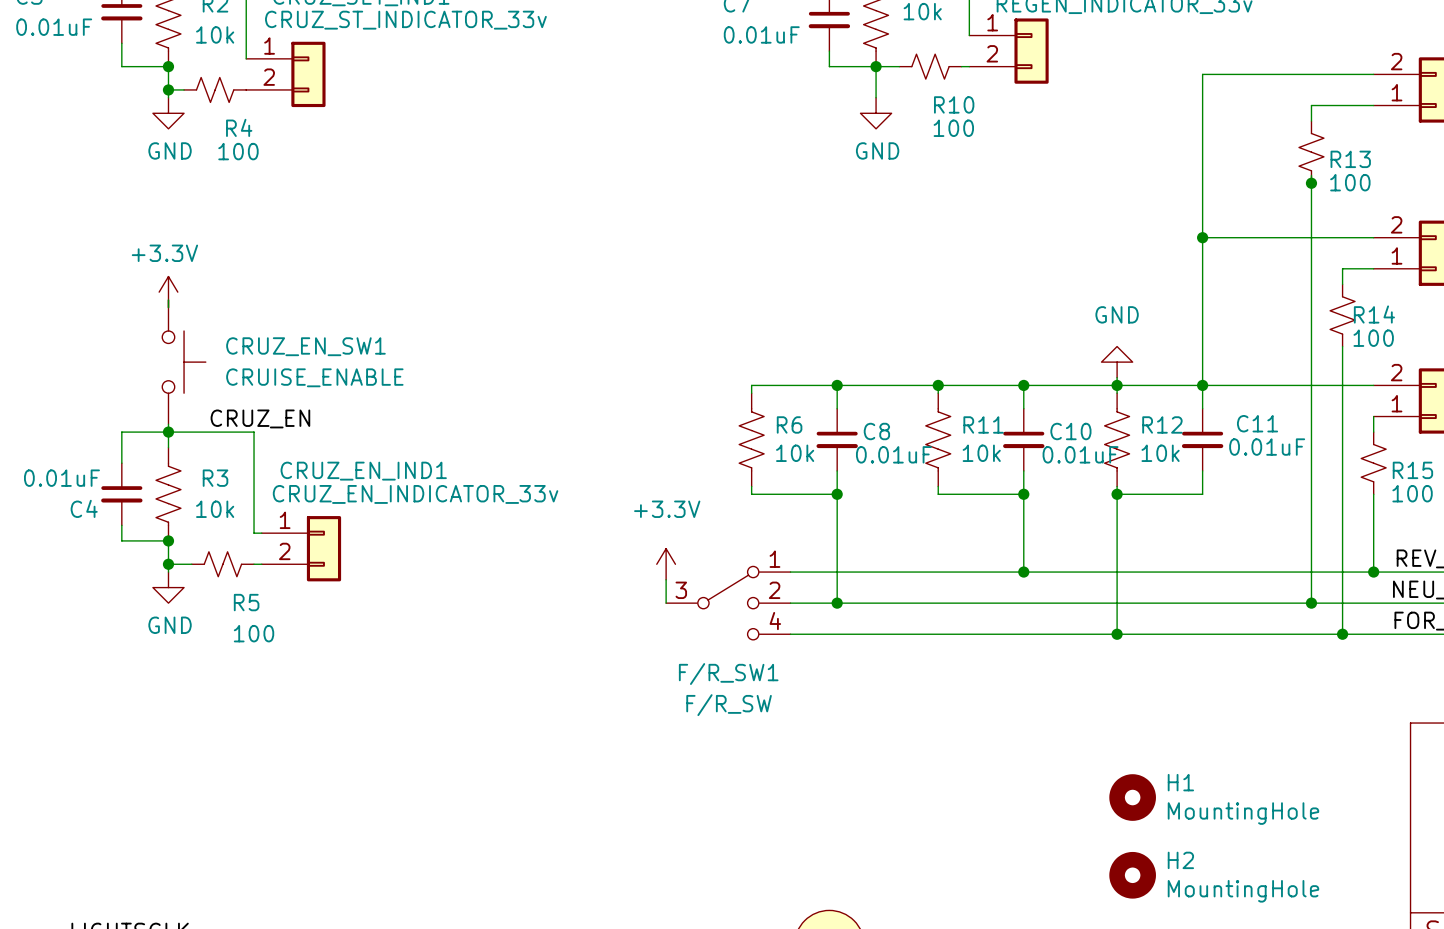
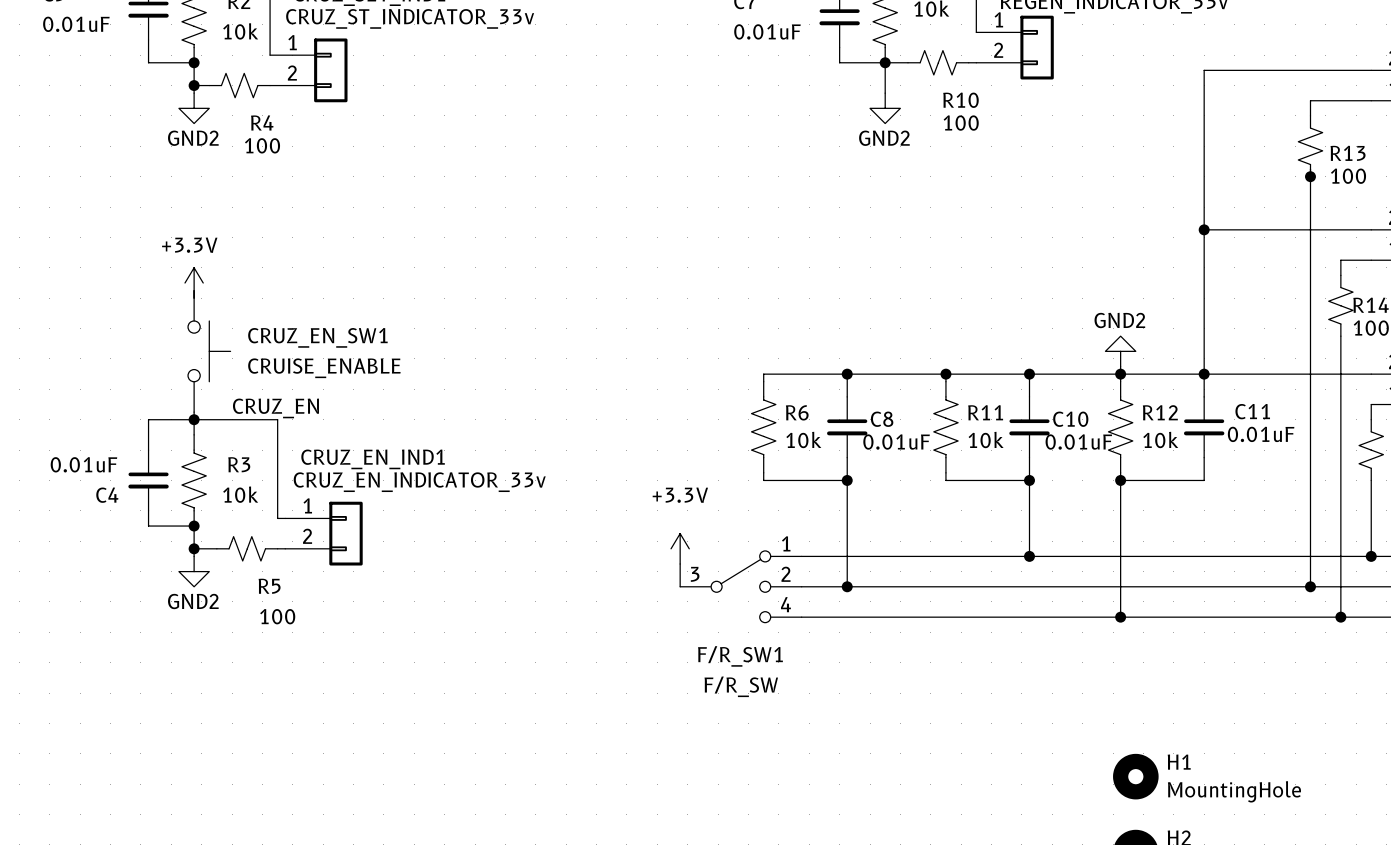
power symbol: GND (168, 113) -> GND2 (194, 108)
power symbol: GND (876, 113) -> GND2 (885, 108)
power symbol: GND (1117, 362) -> GND2 (1120, 351)
power symbol: GND (168, 587) -> GND2 (194, 571)

